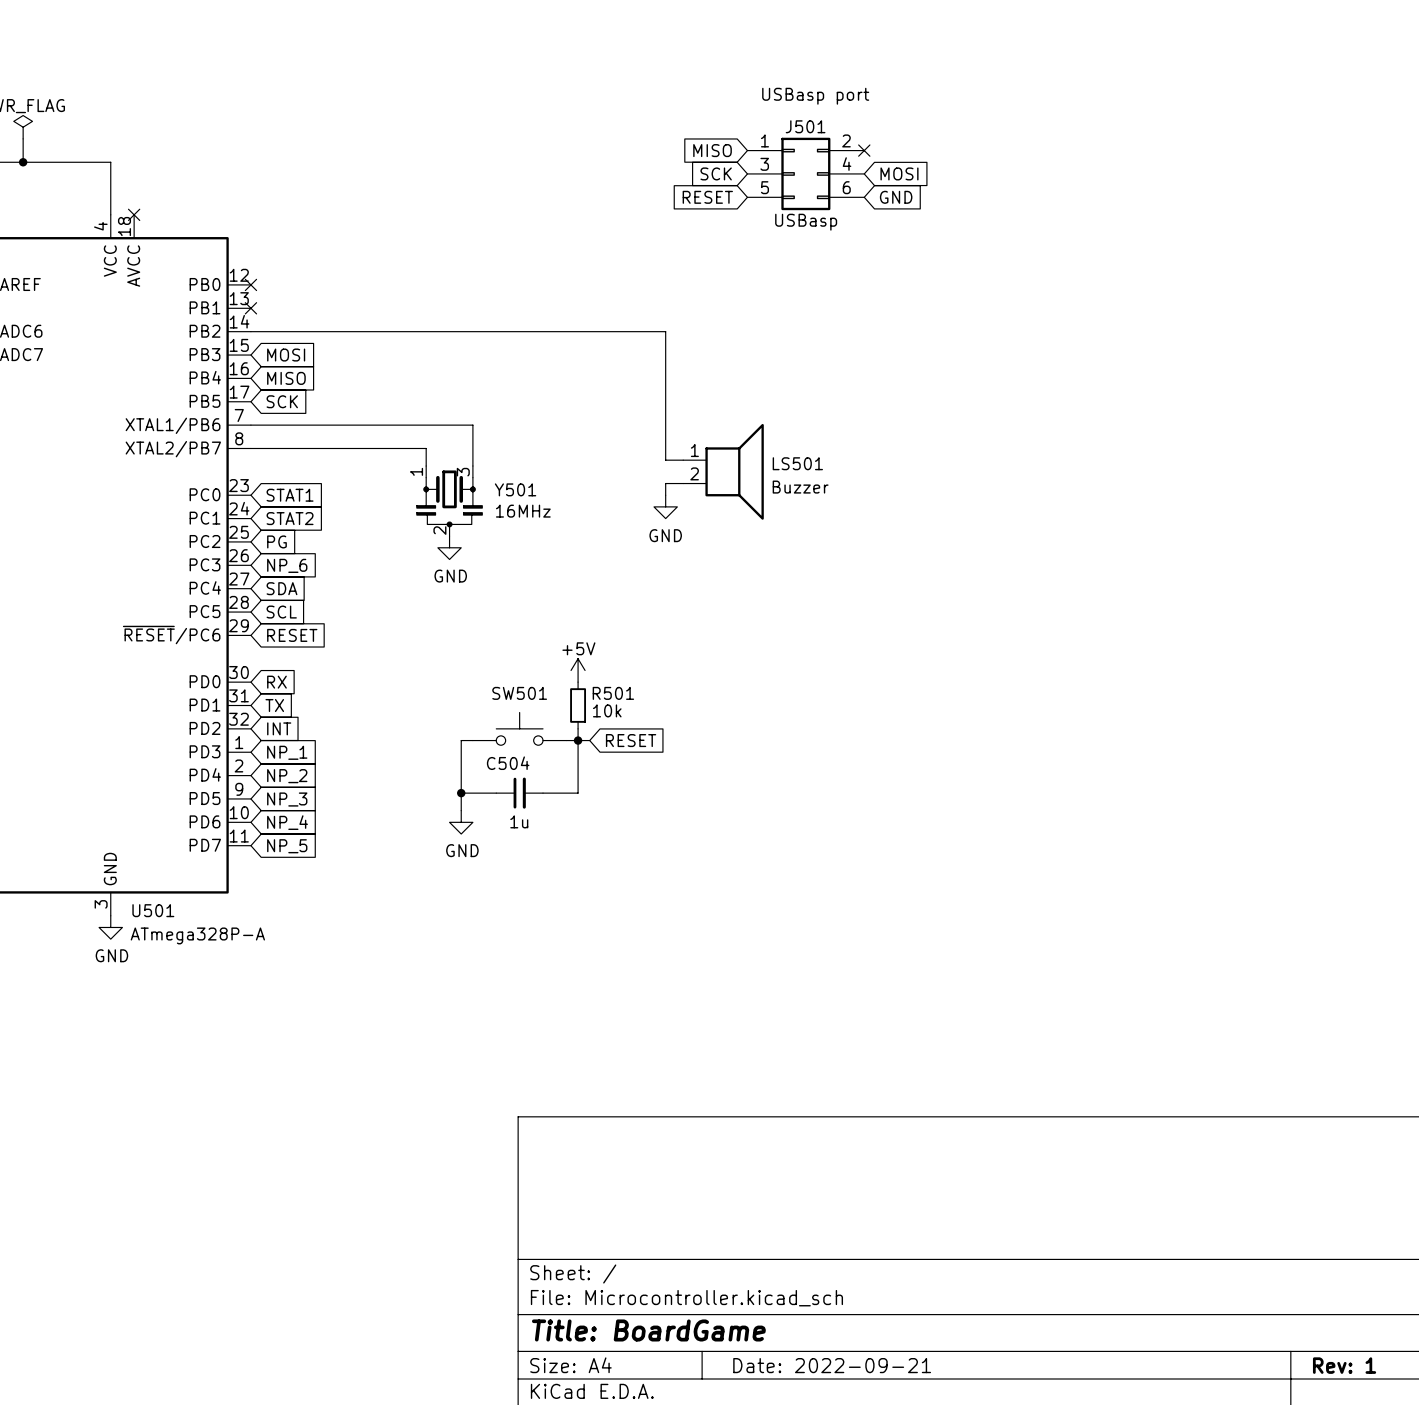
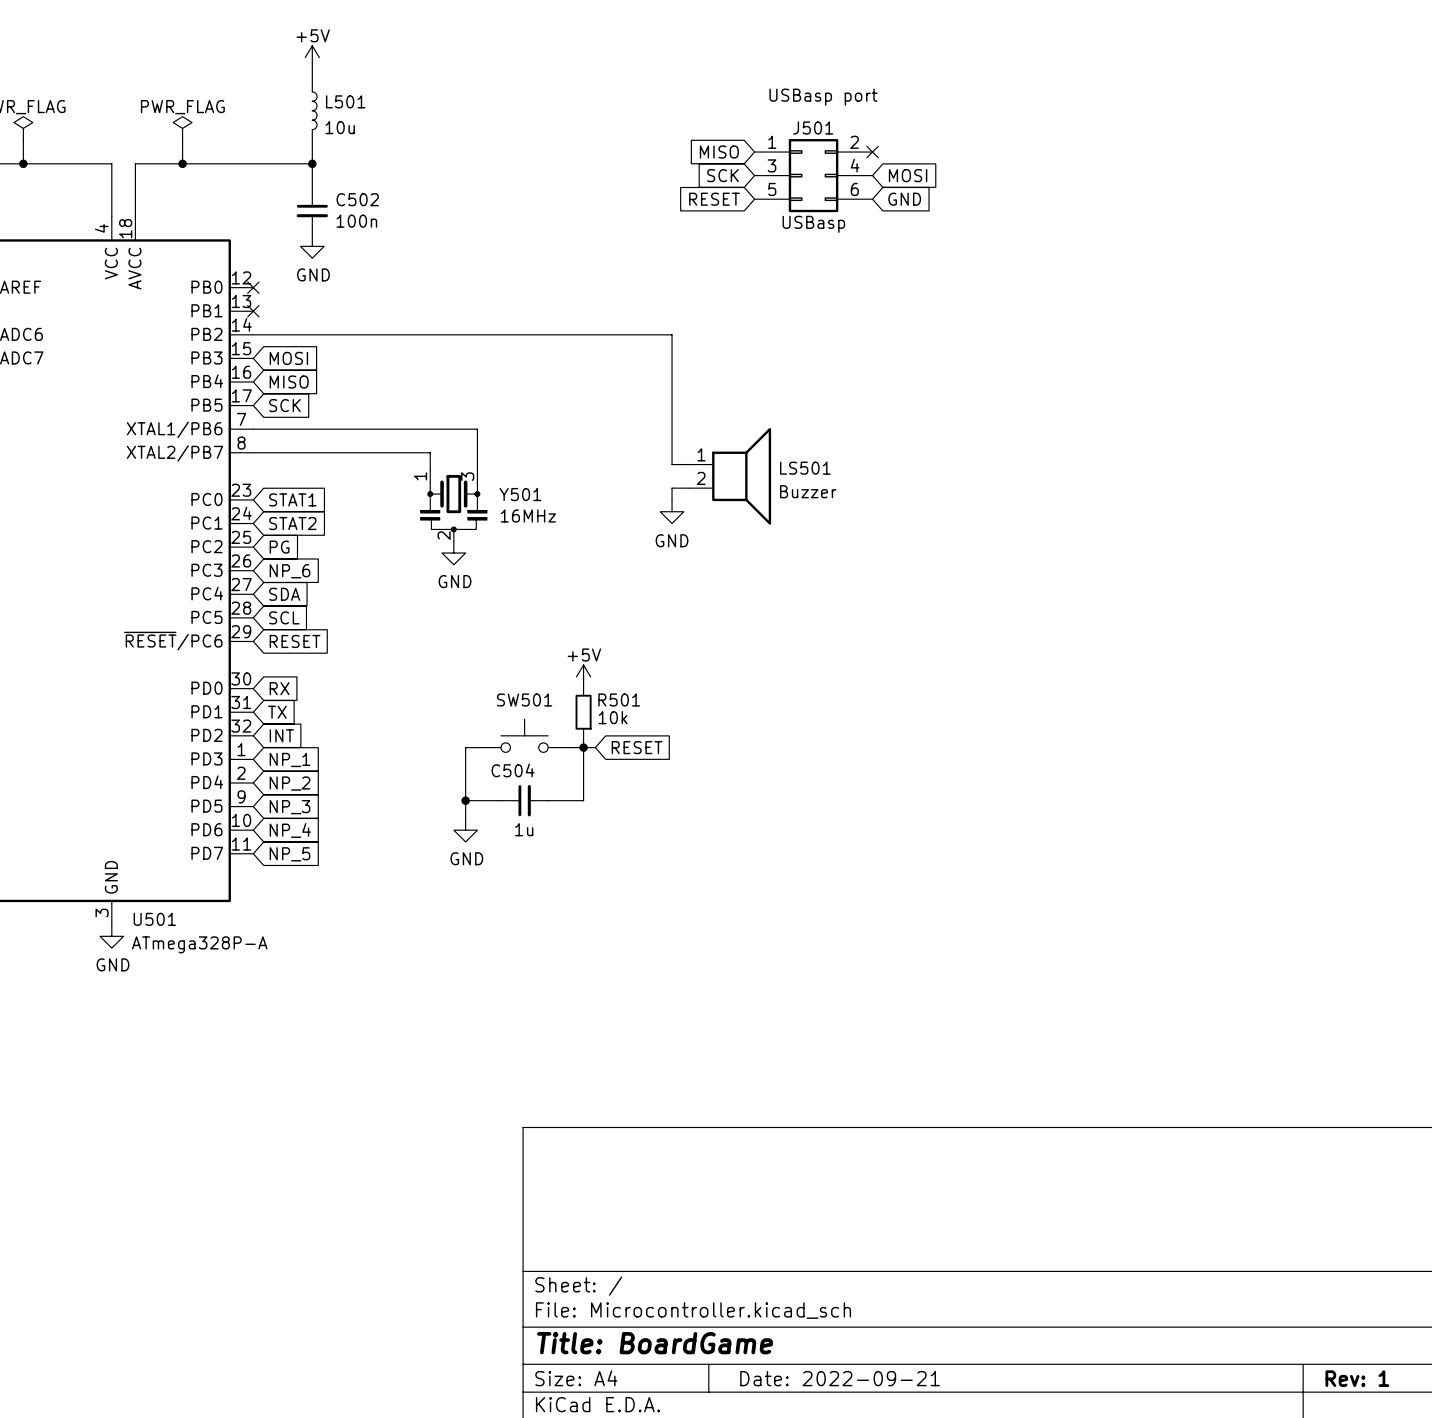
power symbol: none -> +5V (312, 57)
wire: none -> (312, 69) (312, 87)
L501: none -> 10u (314, 110)
power symbol: none -> PWR_FLAG (182, 128)
wire: none -> (312, 134) (312, 187)
wire: none -> (182, 140) (182, 163)
junction: none -> (182, 163)
wire: none -> (312, 163) (135, 163) (135, 216)
junction: none -> (312, 163)
C502: none -> 100n (312, 210)
no-connect mark: (134, 214) -> none
power symbol: none -> GND (312, 246)

